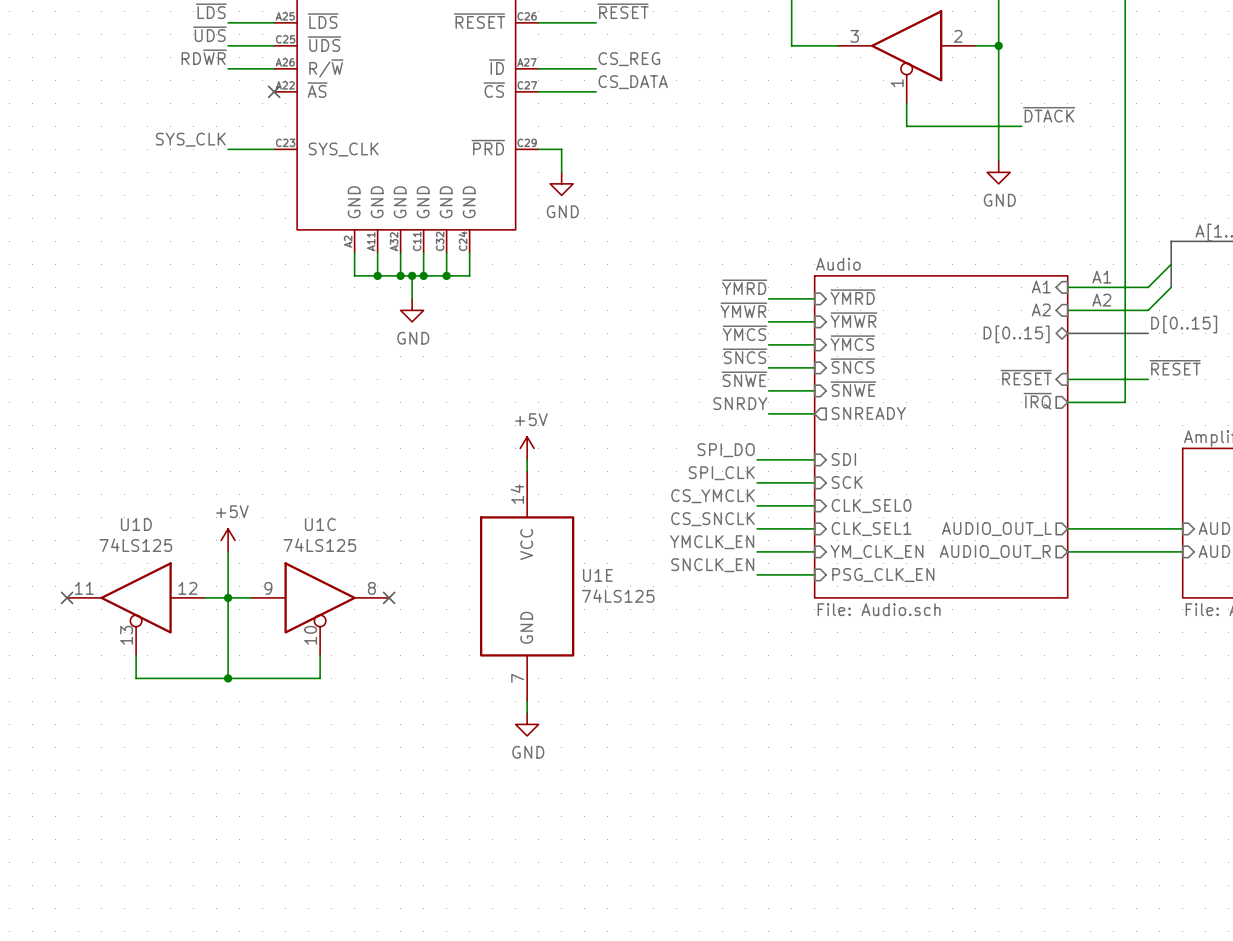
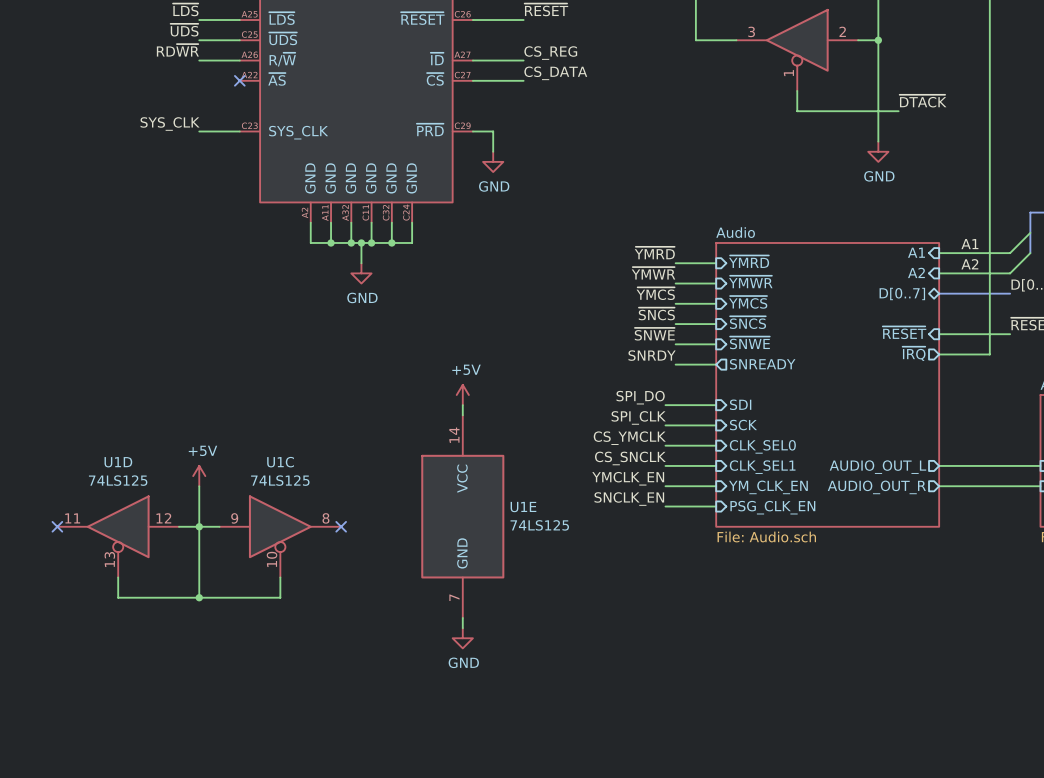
sheet pin: D[0..15] (1016, 334) -> D[0..7] (902, 293)

